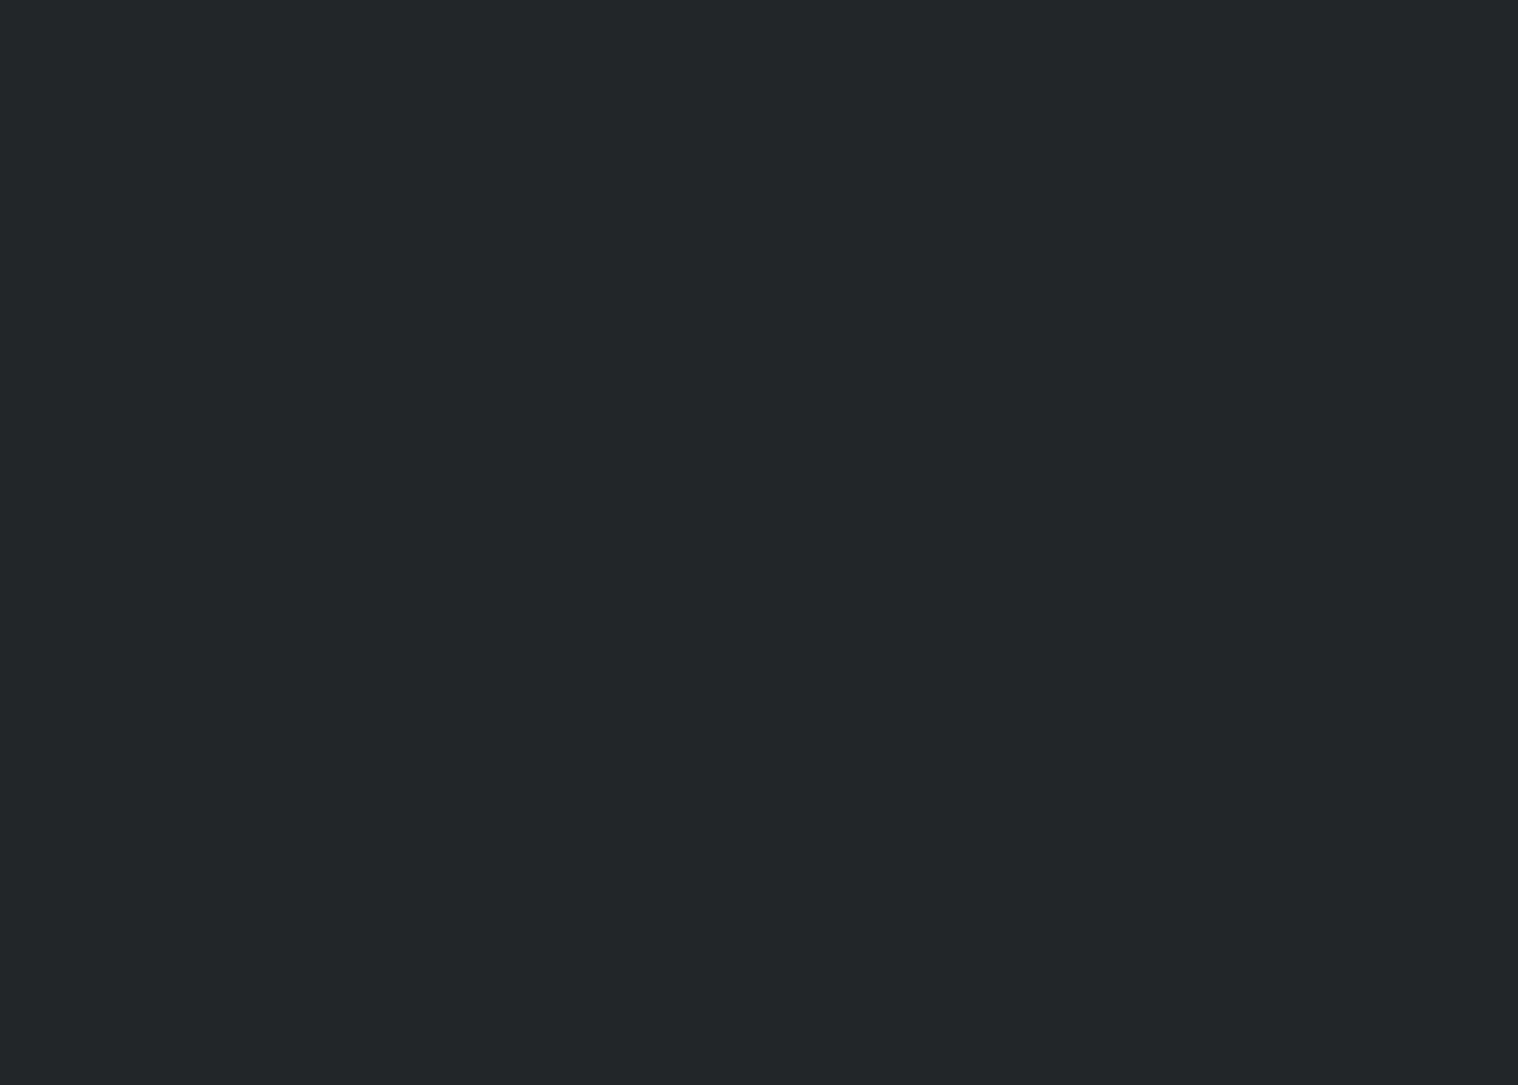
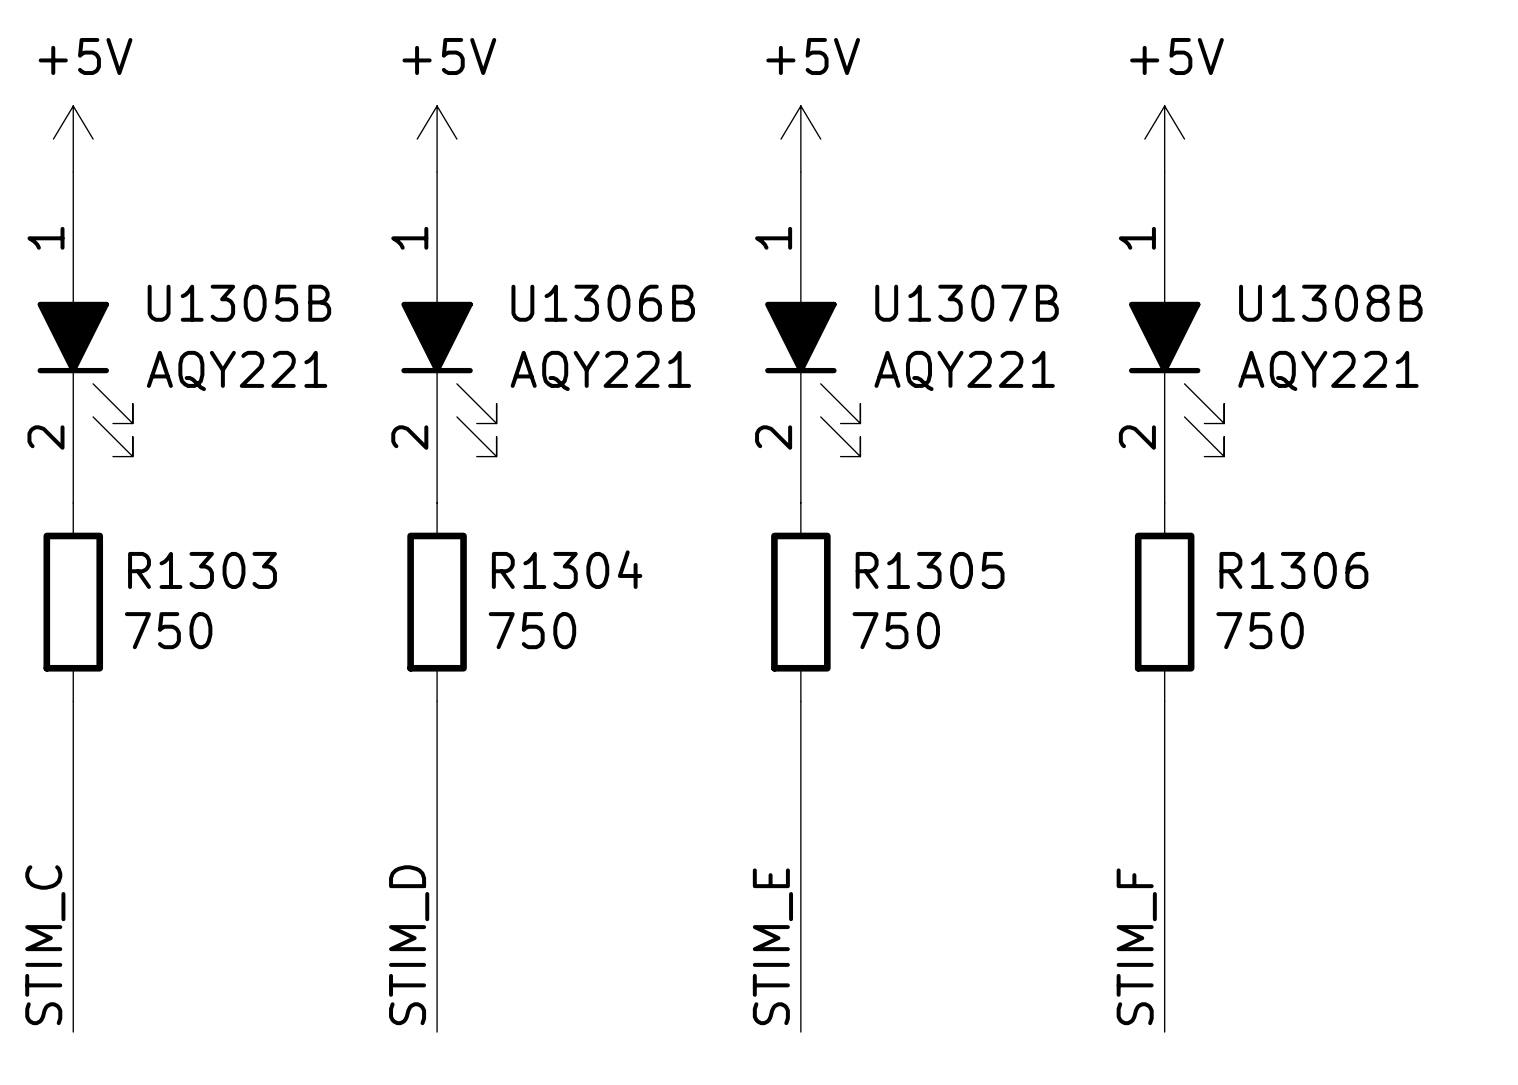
power symbol: none -> +5V (73, 139)
power symbol: none -> +5V (437, 139)
power symbol: none -> +5V (800, 139)
power symbol: none -> +5V (1164, 139)
U1305B: none -> AQY221 (85, 337)
U1306B: none -> AQY221 (448, 337)
U1307B: none -> AQY221 (812, 337)
U1308B: none -> AQY221 (1176, 337)
R1303: none -> 750 (73, 602)
R1304: none -> 750 (437, 602)
R1305: none -> 750 (800, 602)
R1306: none -> 750 (1164, 602)
wire: none -> (73, 701) (73, 1032)
wire: none -> (437, 701) (437, 1032)
wire: none -> (800, 701) (800, 1032)
wire: none -> (1164, 701) (1164, 1032)
label: none -> STIM_C (45, 945)
label: none -> STIM_D (409, 945)
label: none -> STIM_E (772, 946)
label: none -> STIM_F (1136, 946)

